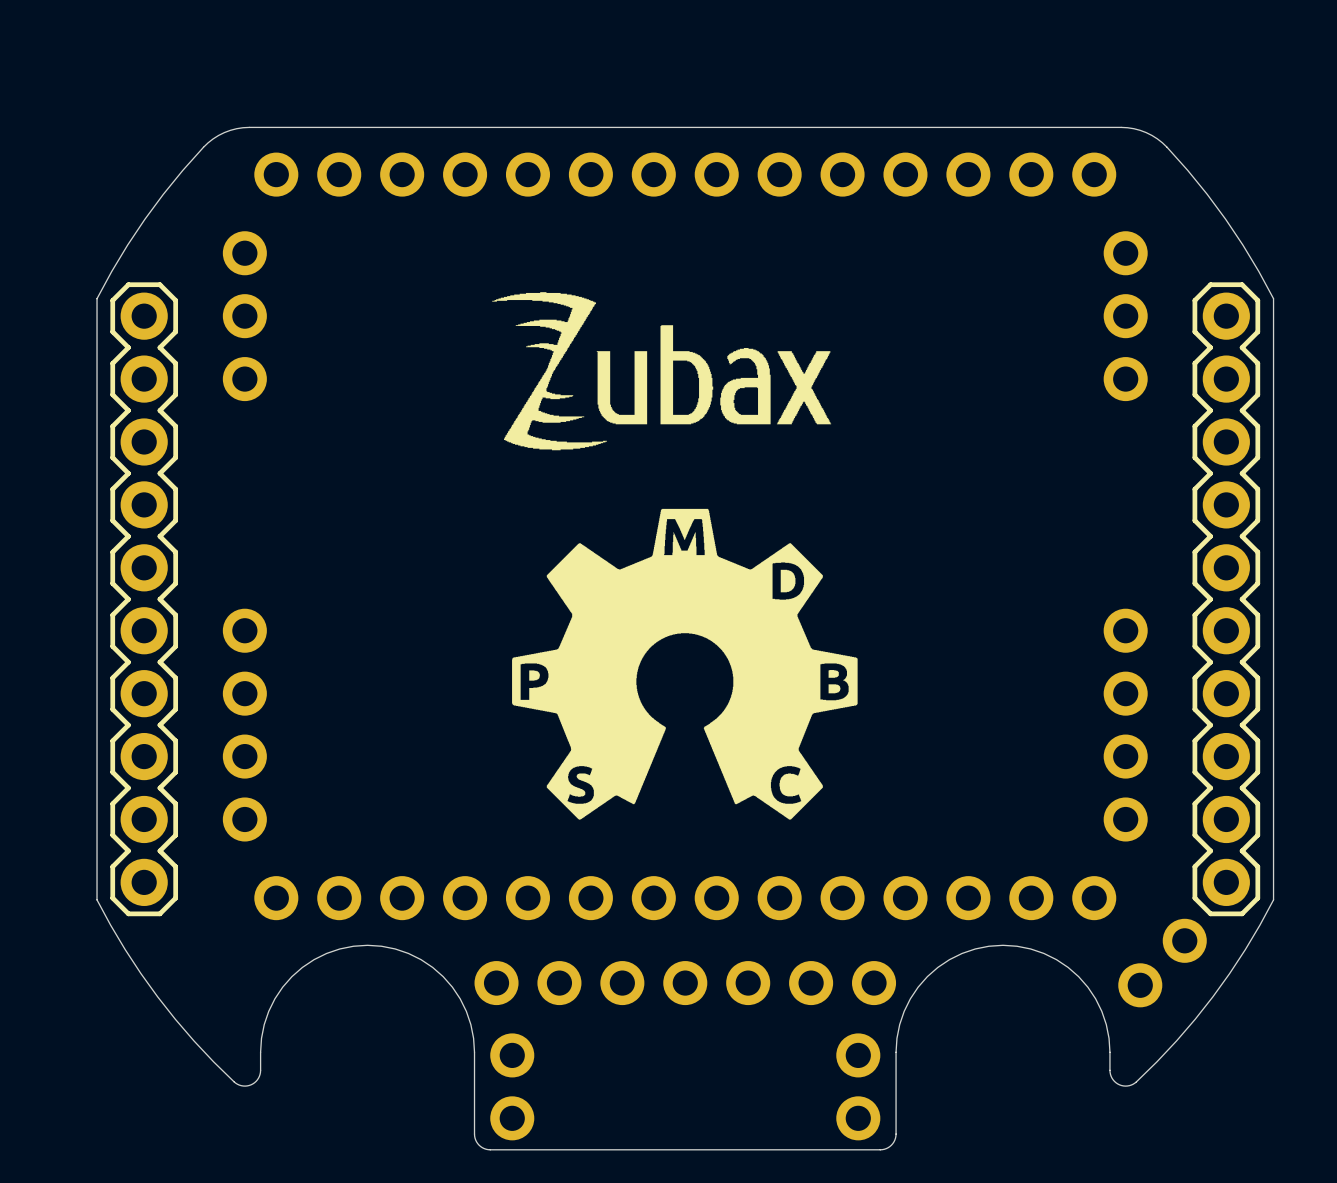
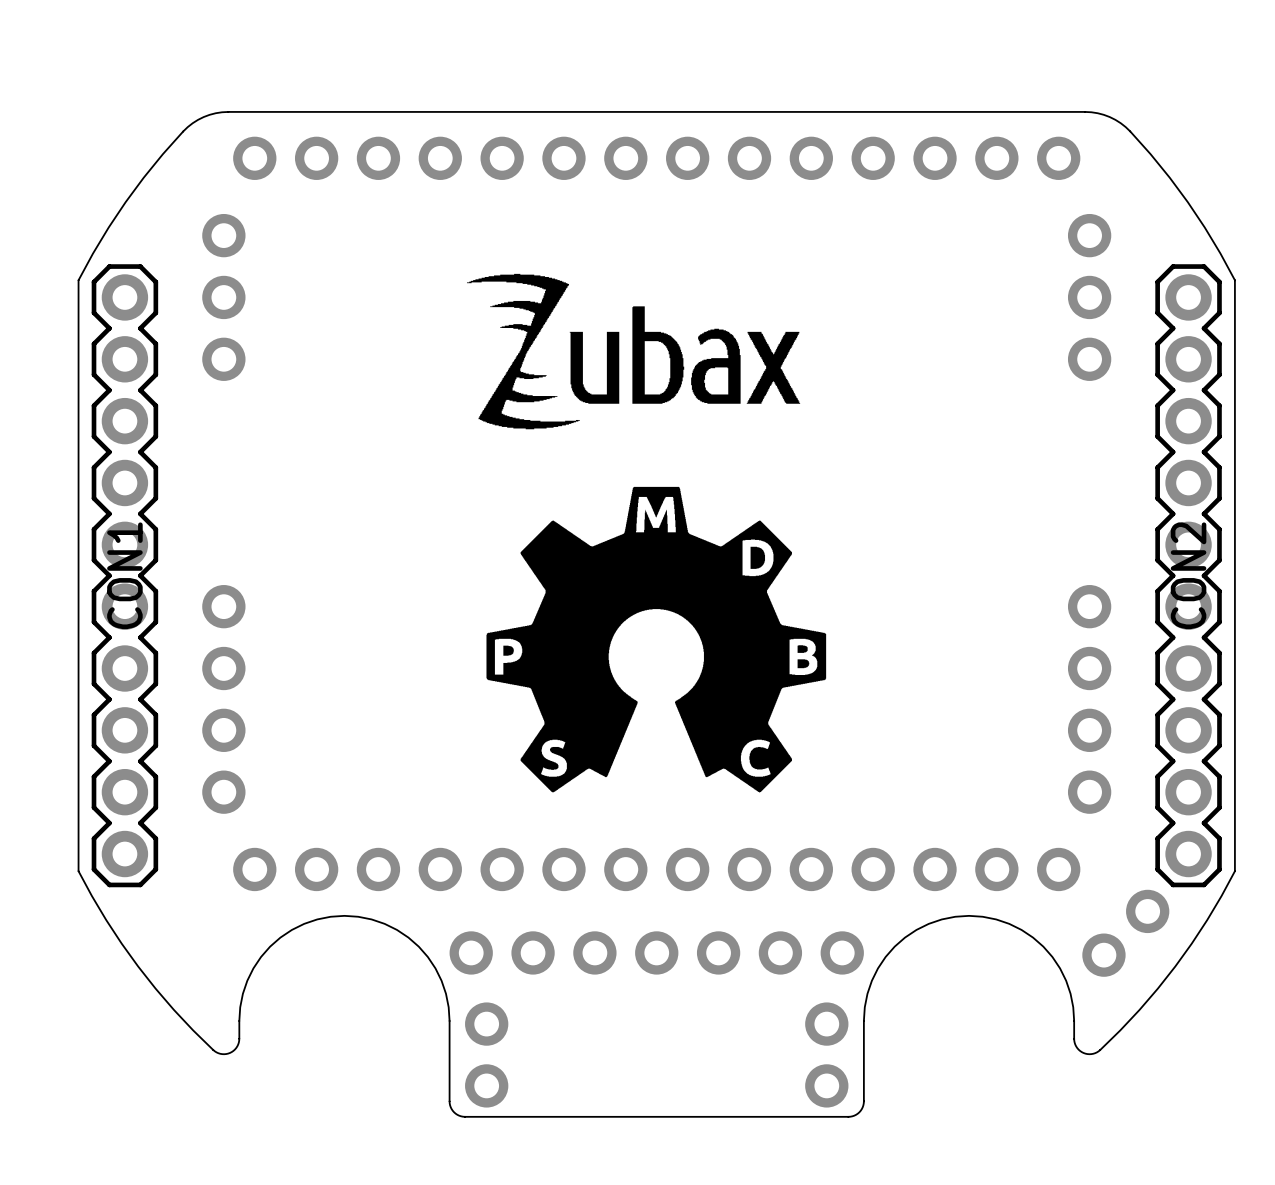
CON1 name: none -> CON1 (124, 575)
CON2 name: none -> CON2 (1188, 575)

